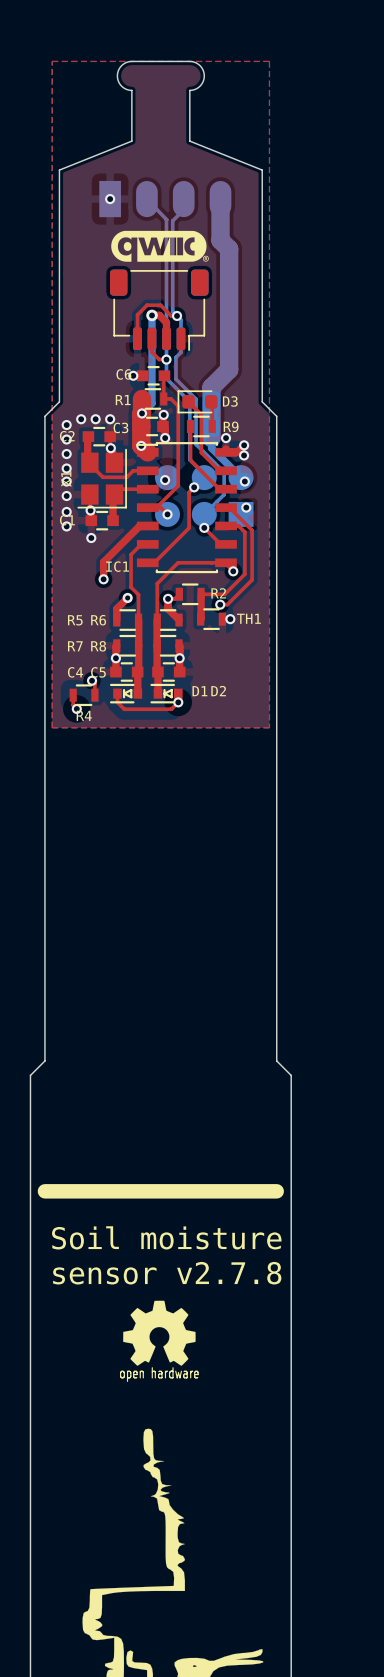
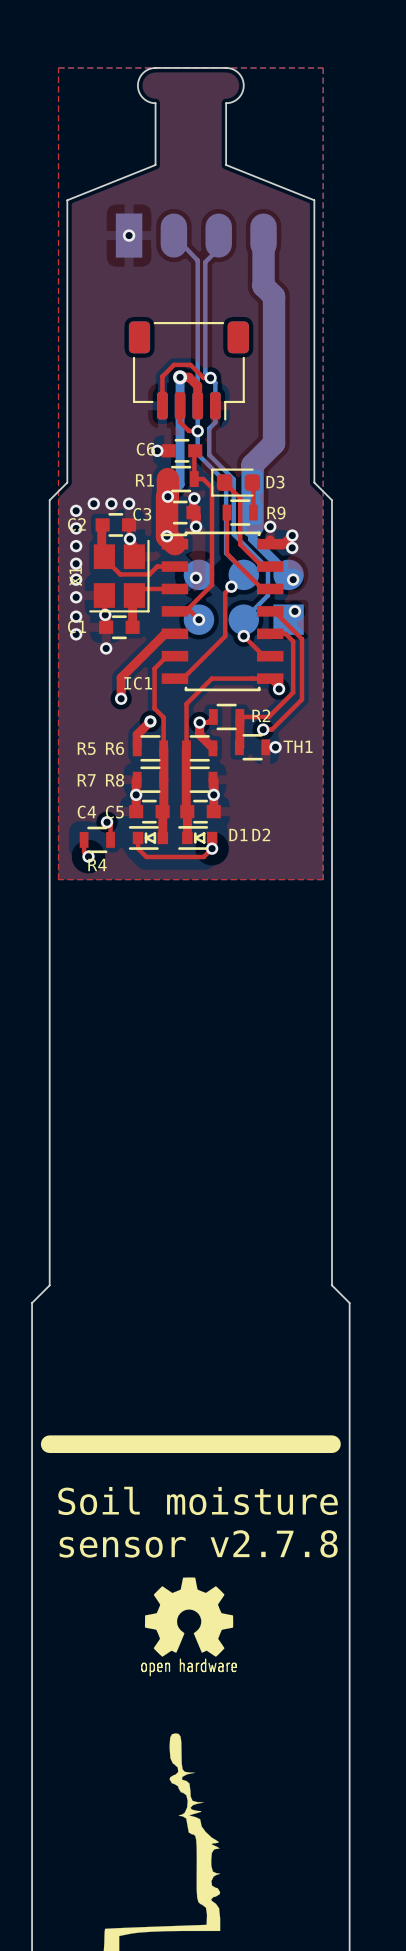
drawing: [111, 230, 209, 262] -> none

